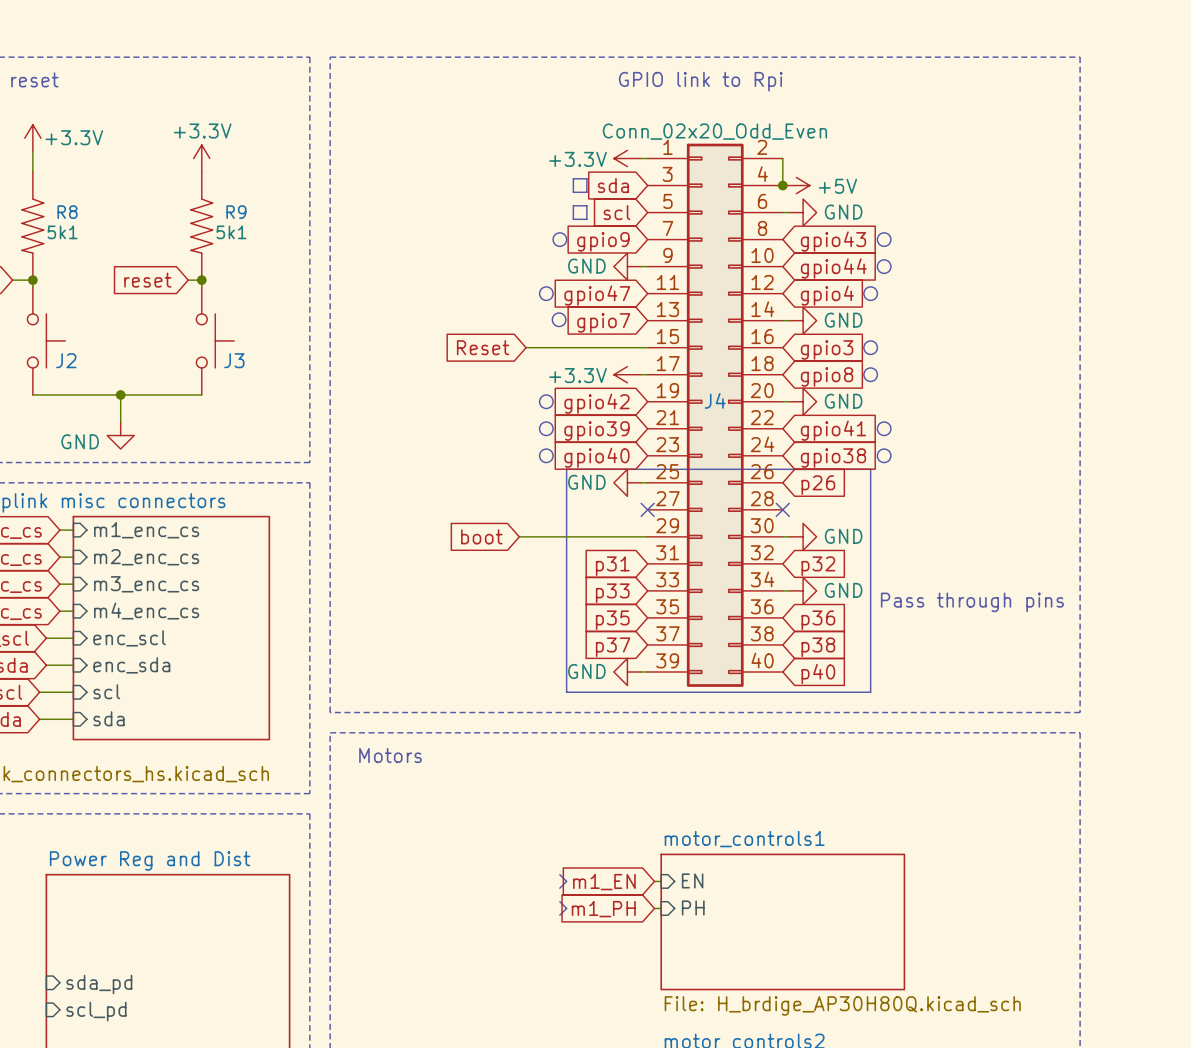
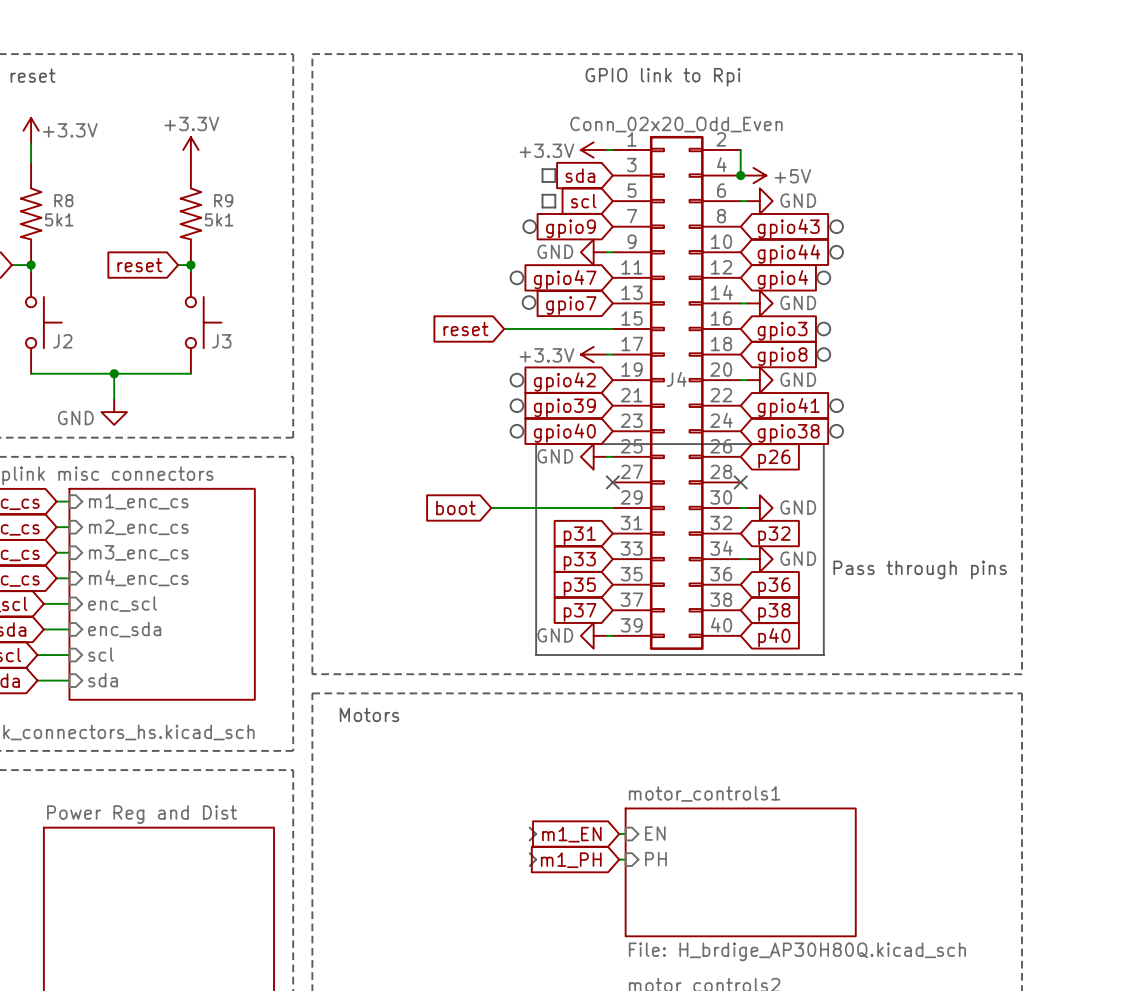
global label: Reset (483, 347) -> reset (465, 328)
wire: (526, 347) (532, 347) -> none
sheet pin: sda_pd (99, 984) -> none
sheet pin: scl_pd (96, 1011) -> none

